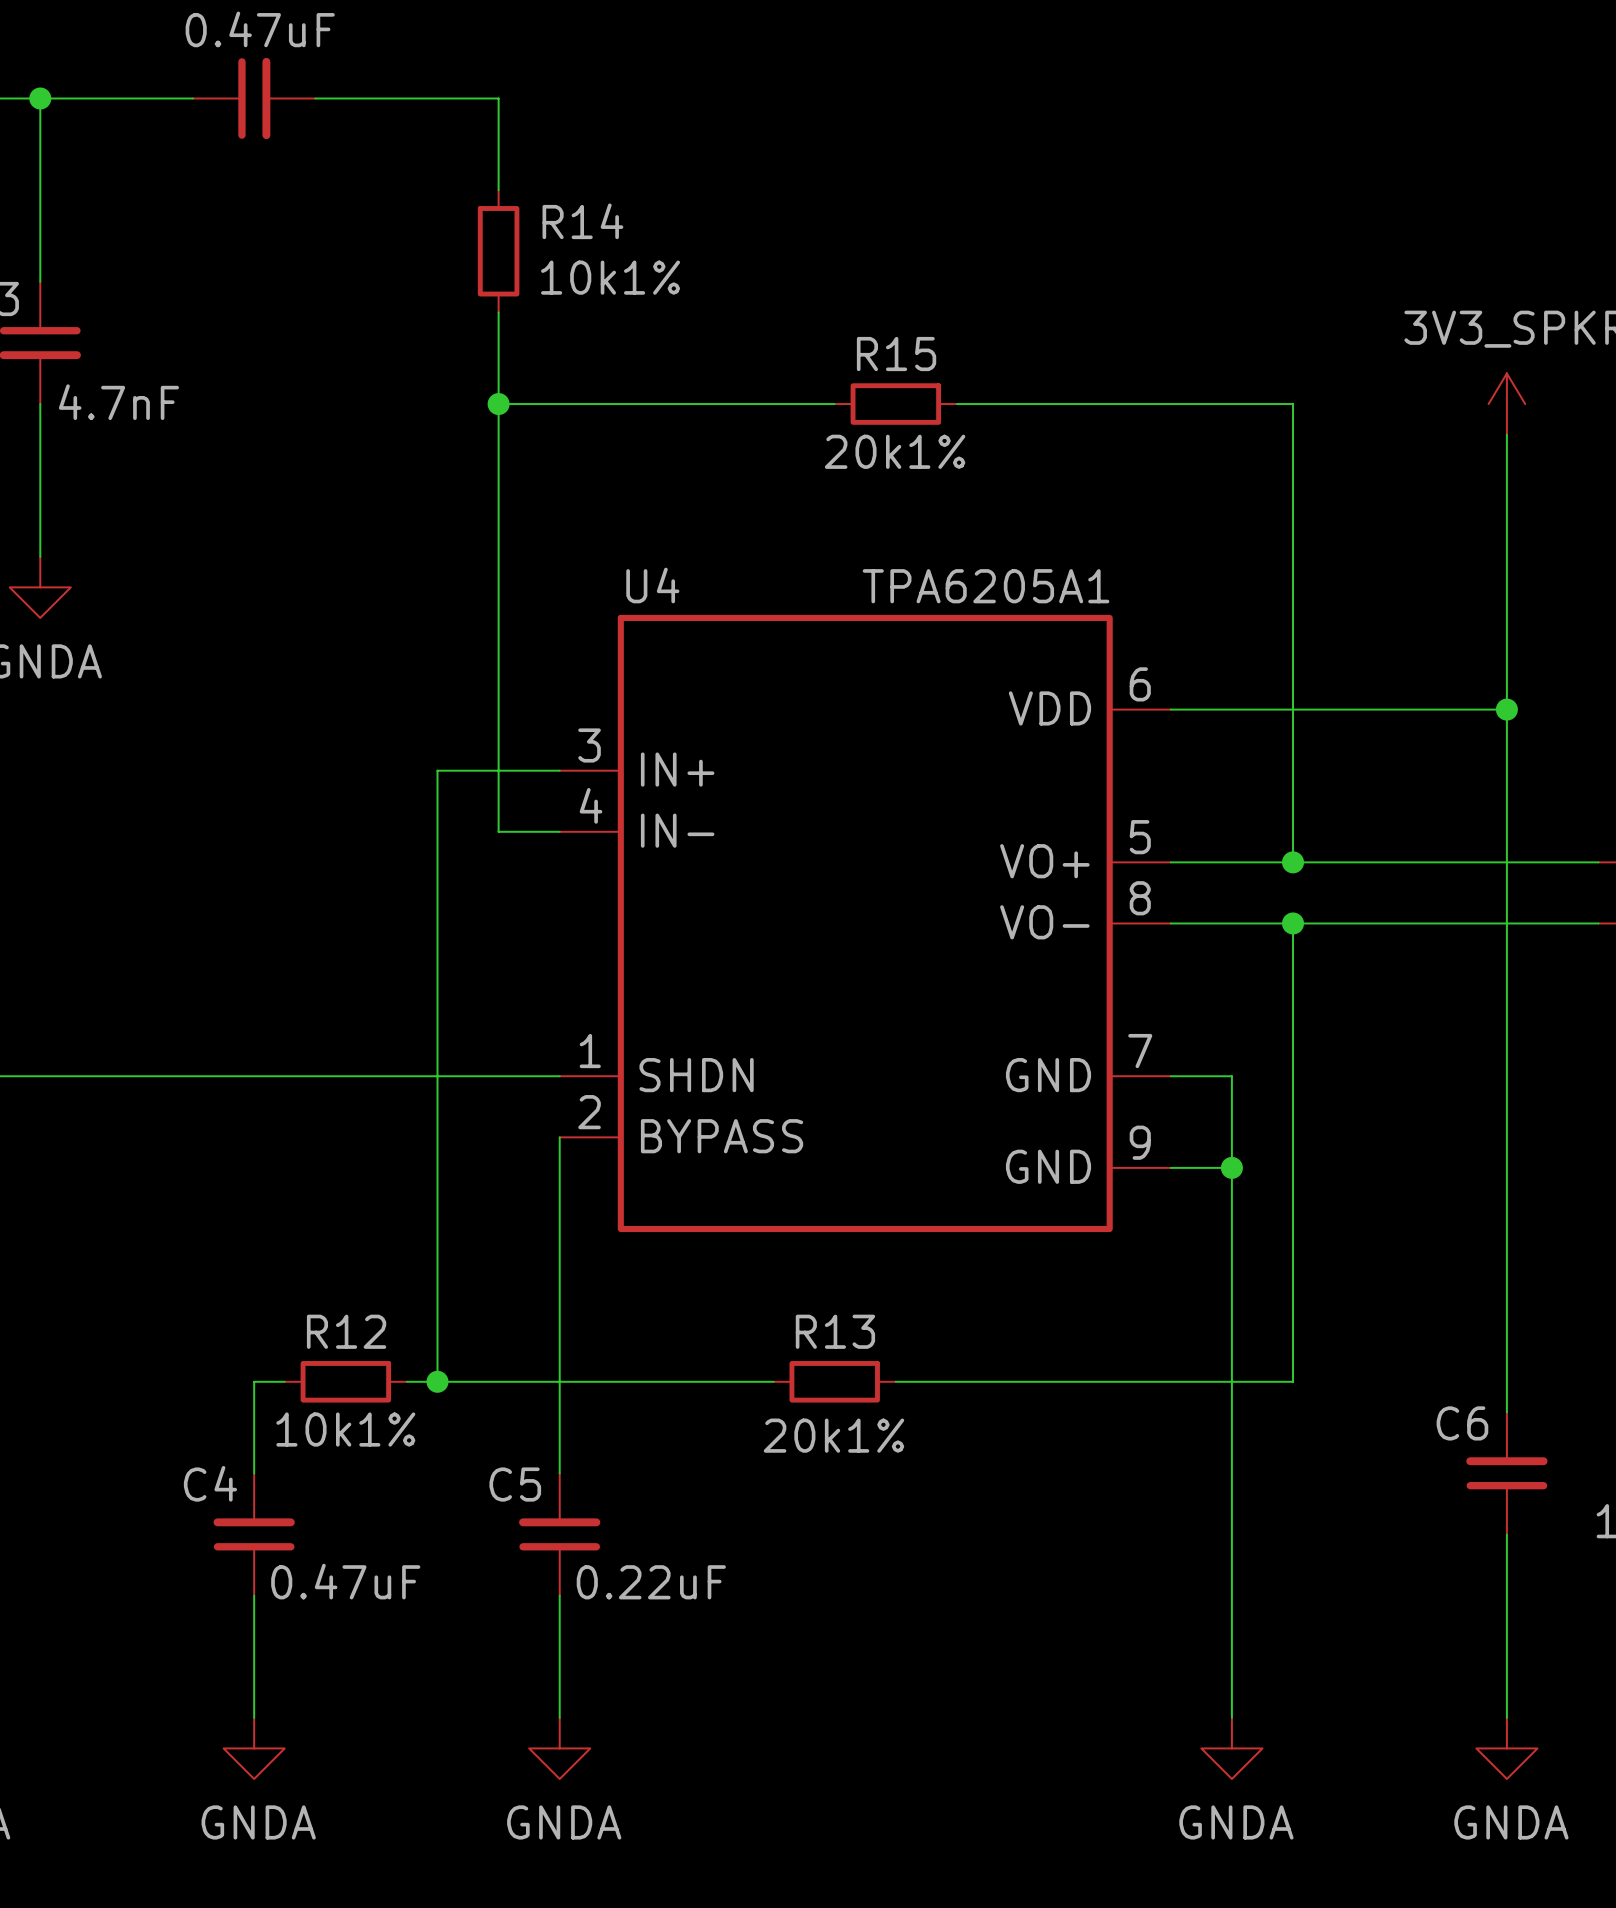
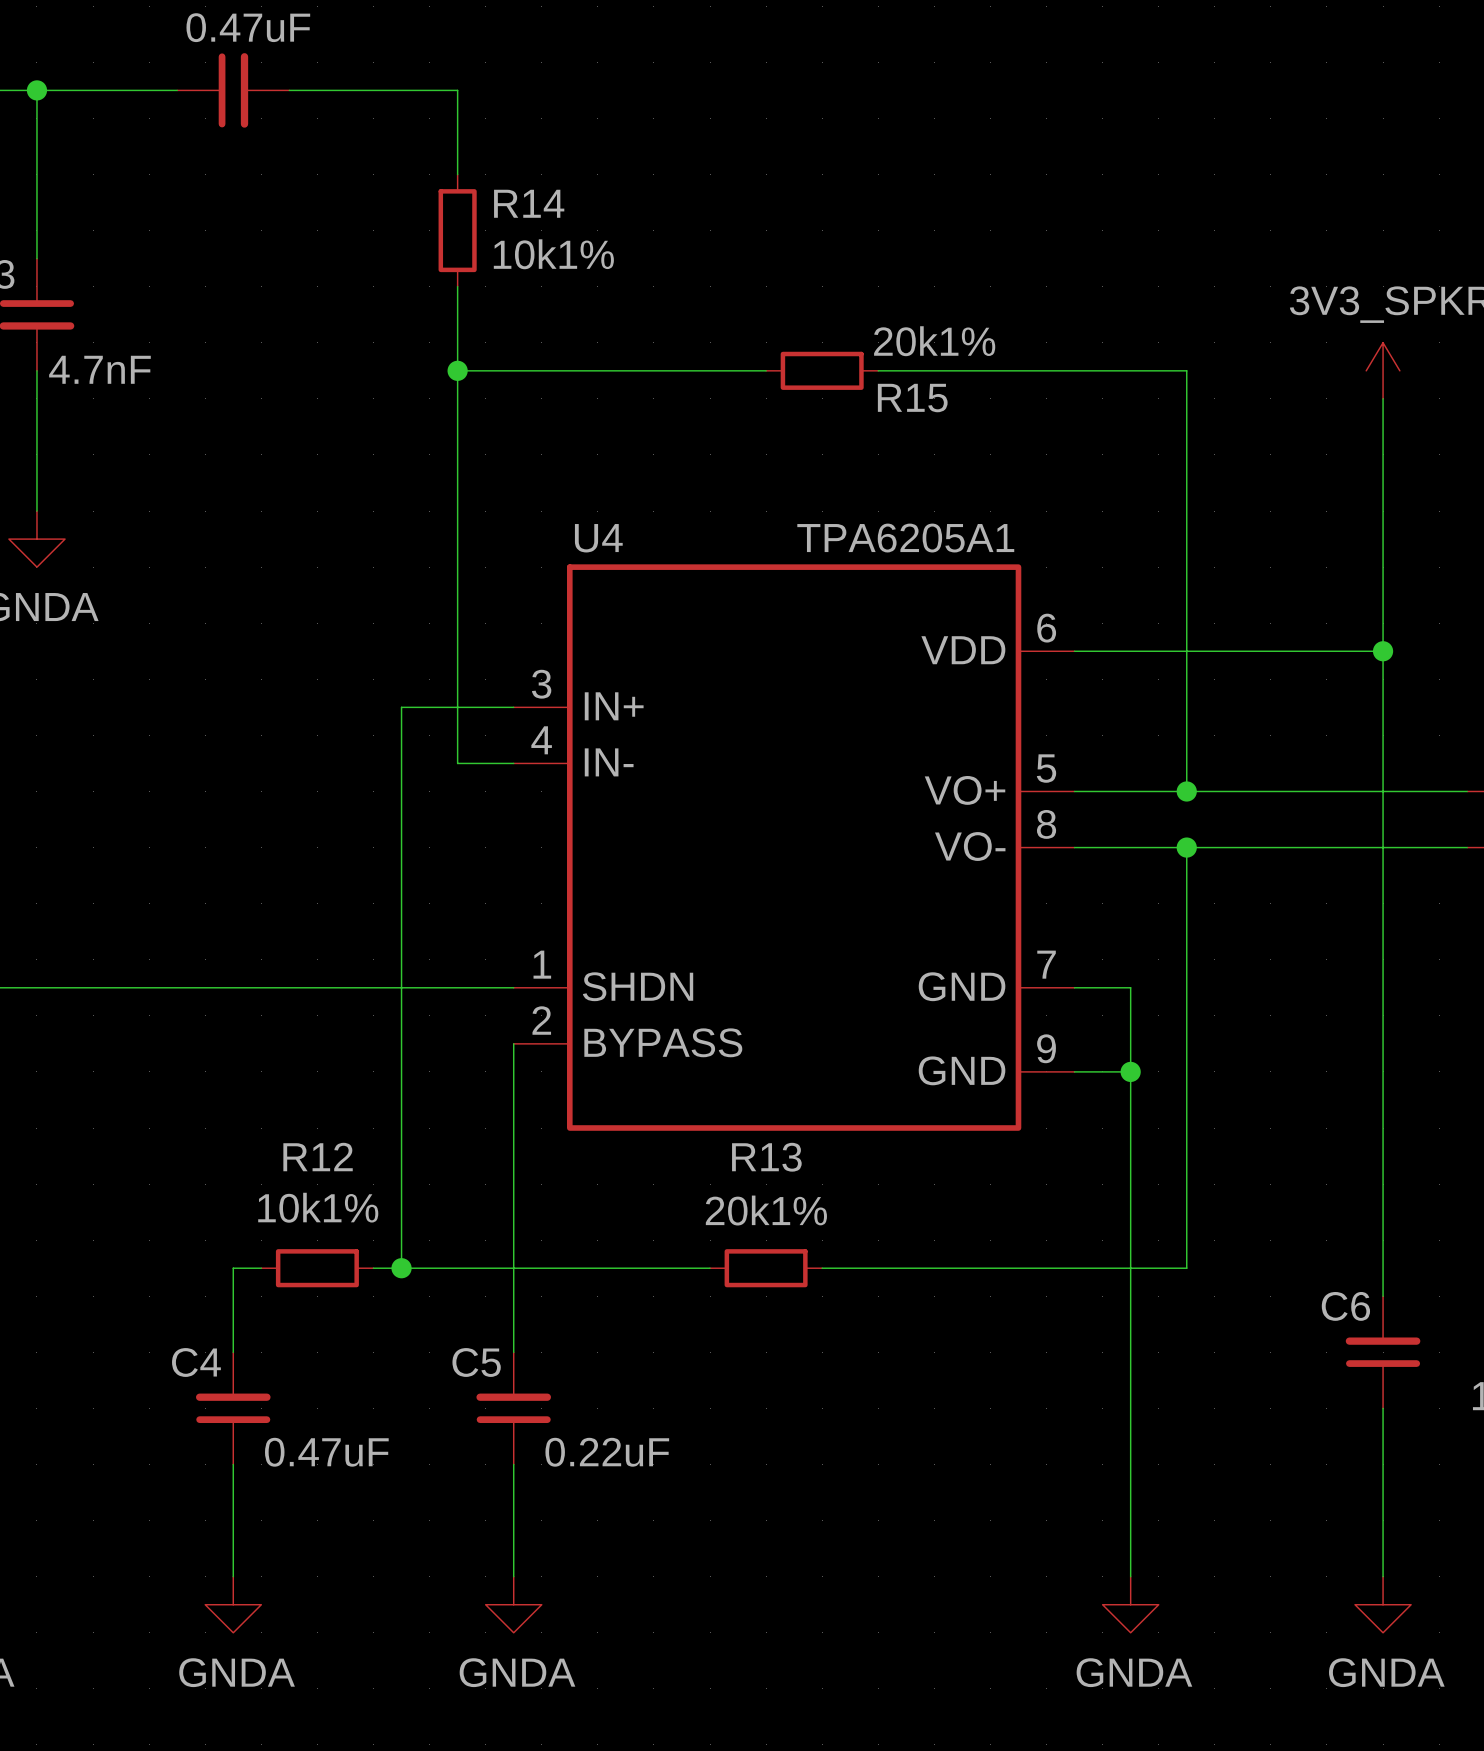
R15 name position: R15 (896, 354) -> R15 (912, 398)
R15 value position: 20k1% (895, 451) -> 20k1% (934, 341)
R12 name position: R12 (346, 1331) -> R12 (318, 1157)
R13 name position: R13 (835, 1331) -> R13 (766, 1157)
R12 value position: 10k1% (345, 1429) -> 10k1% (318, 1207)
R13 value position: 20k1% (833, 1435) -> 20k1% (766, 1210)

